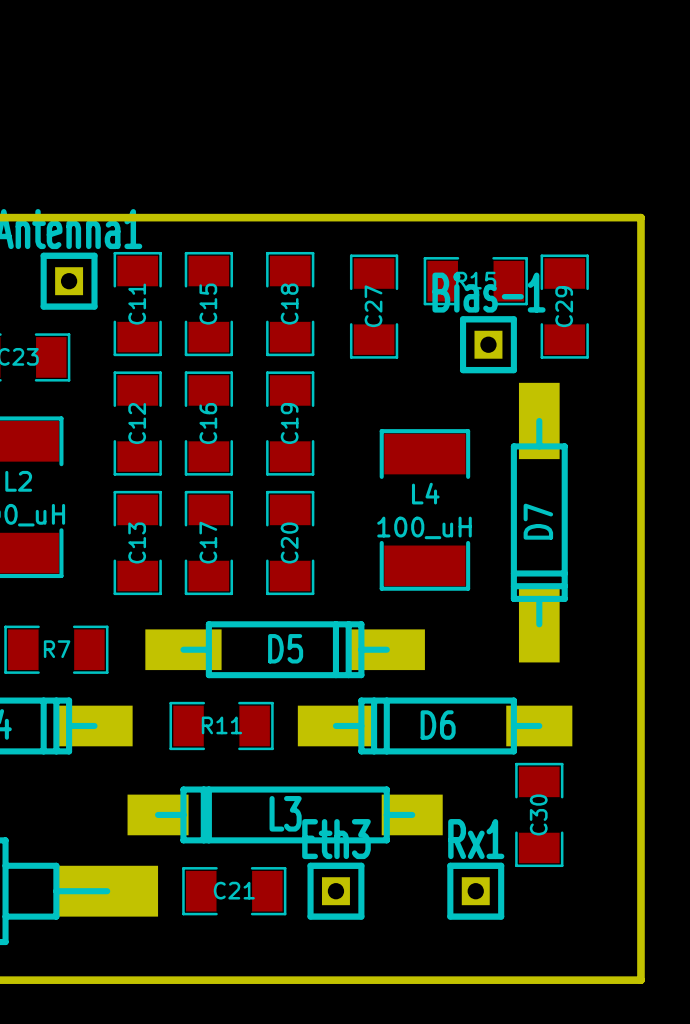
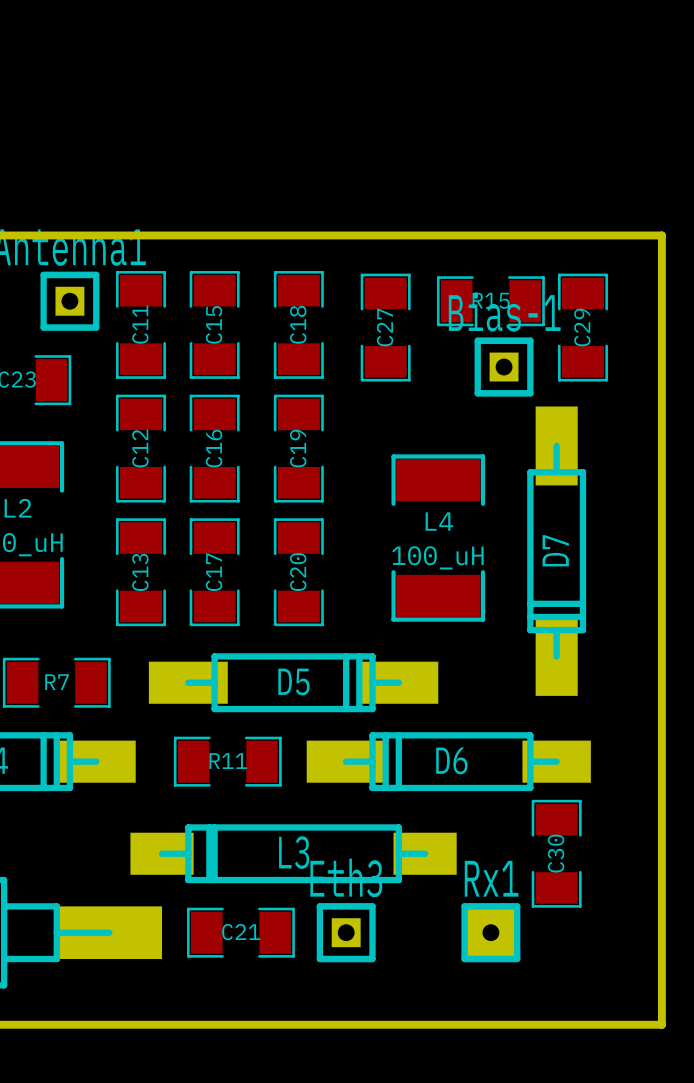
Rx1 footprint: [447, 862, 505, 920] -> [461, 903, 521, 963]

